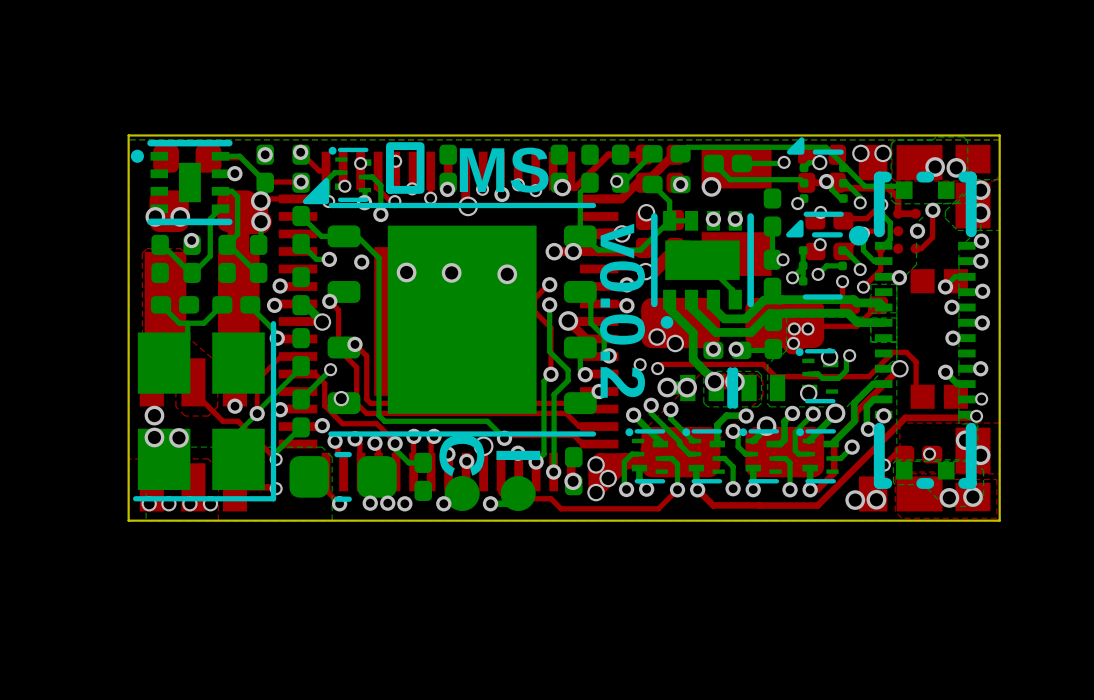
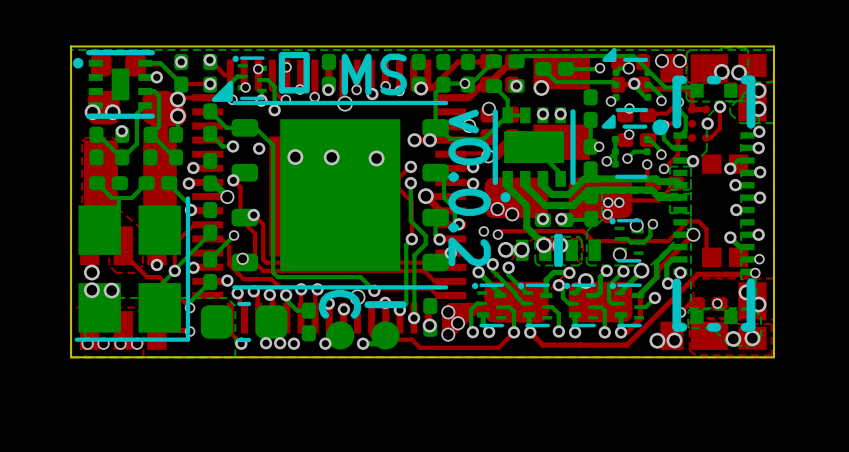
bottom track: none -> (464, 83) (443, 84)

